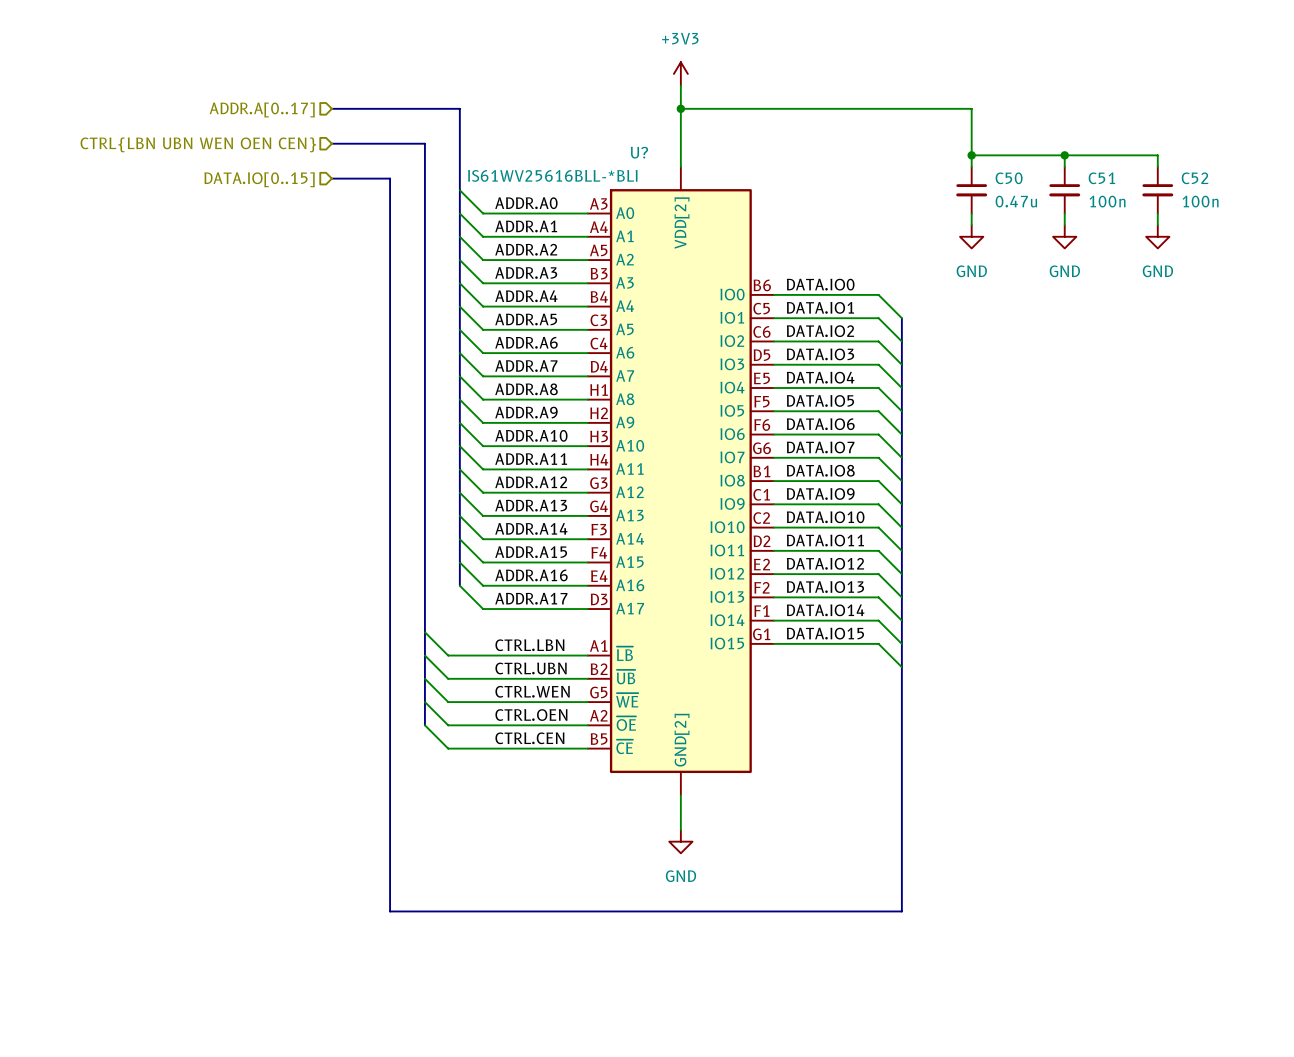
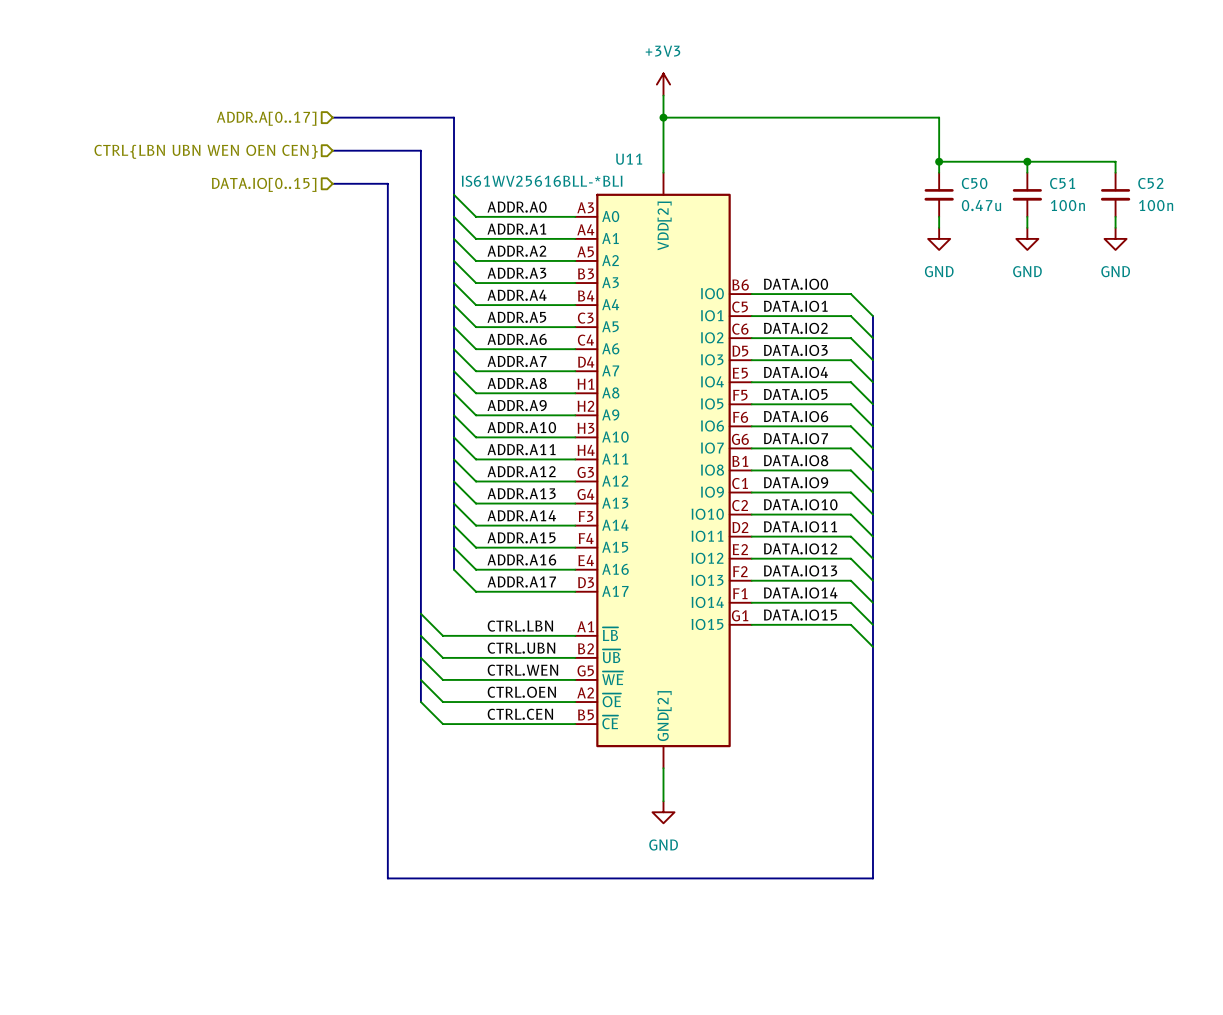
U? name: U? (639, 152) -> U11 (629, 159)

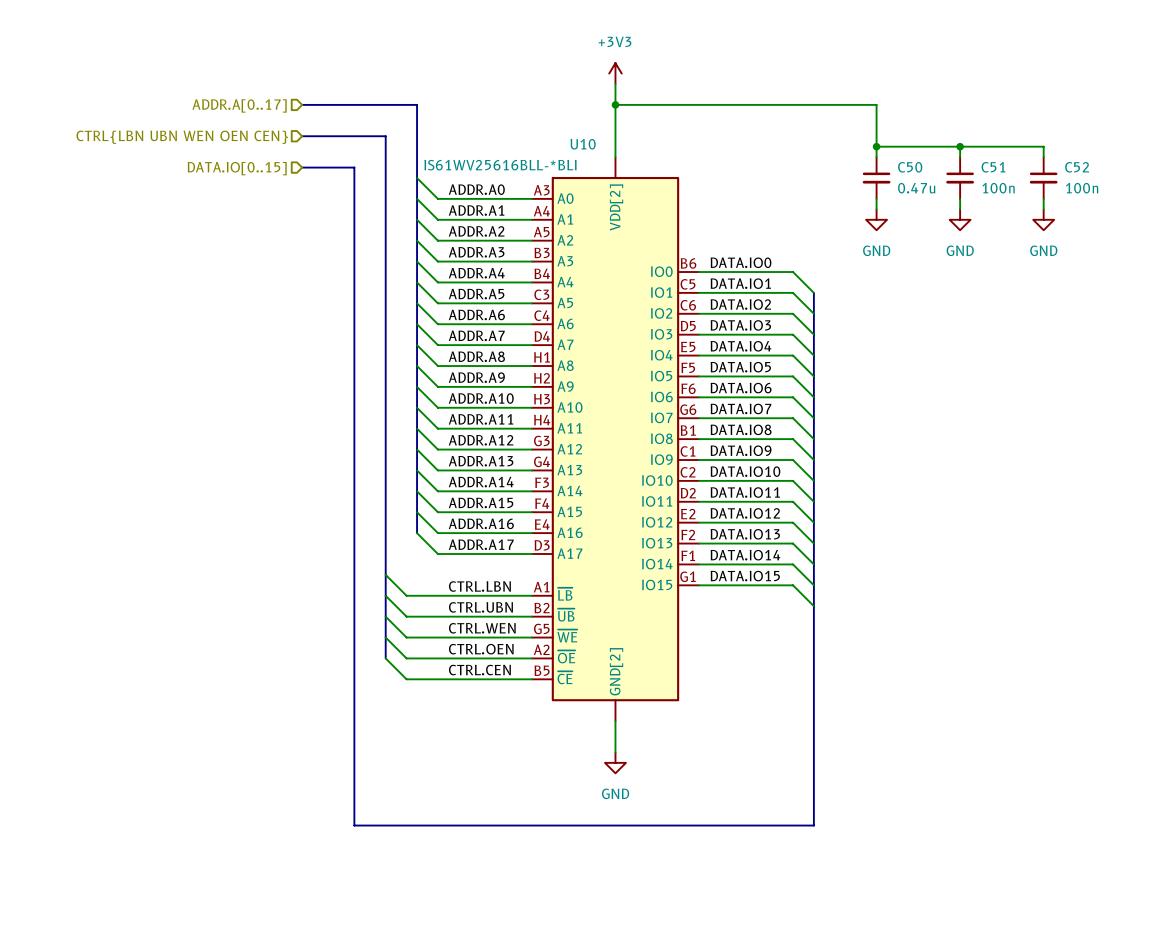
U11 name: U11 (629, 159) -> U10 (583, 144)

